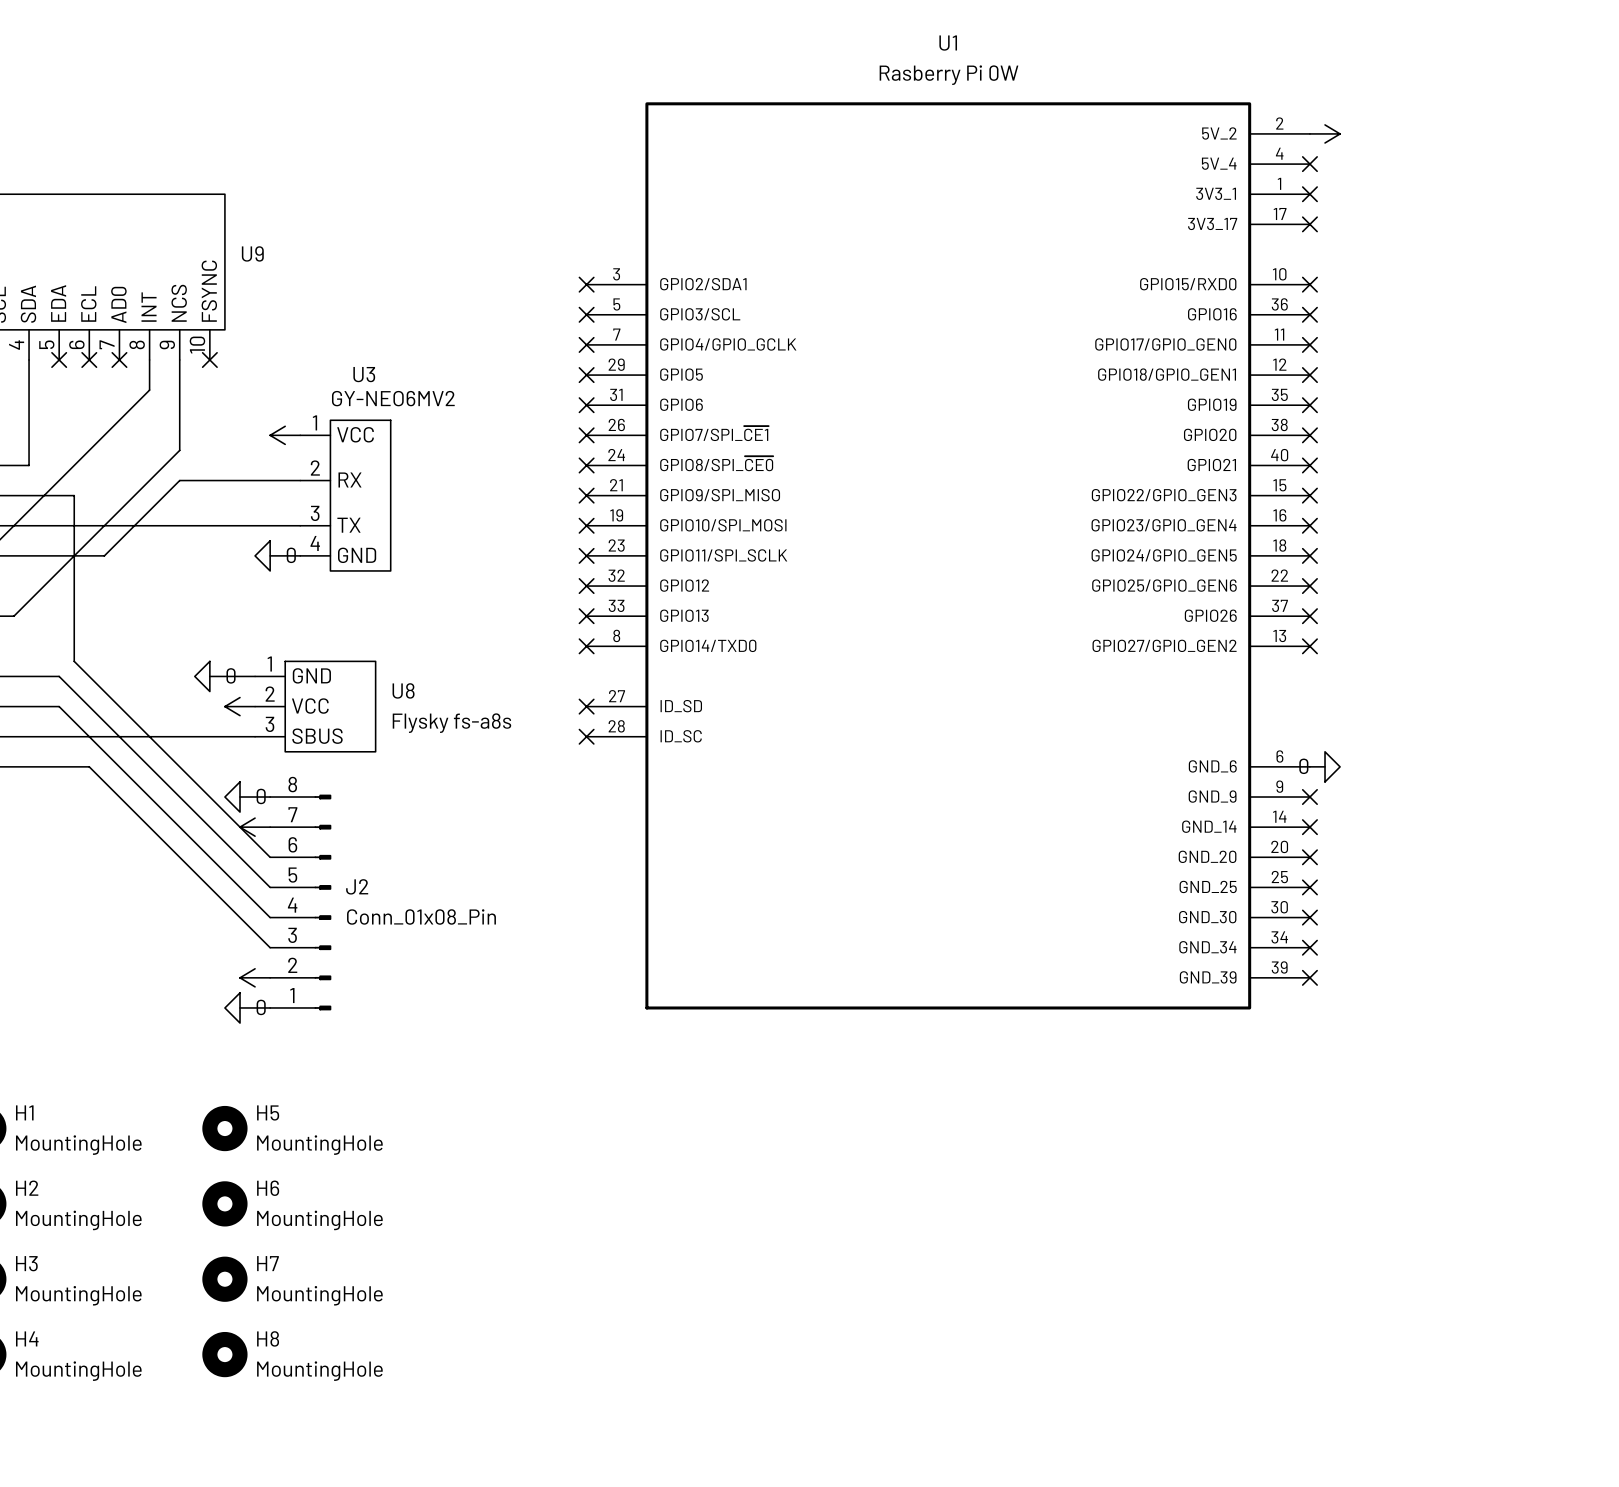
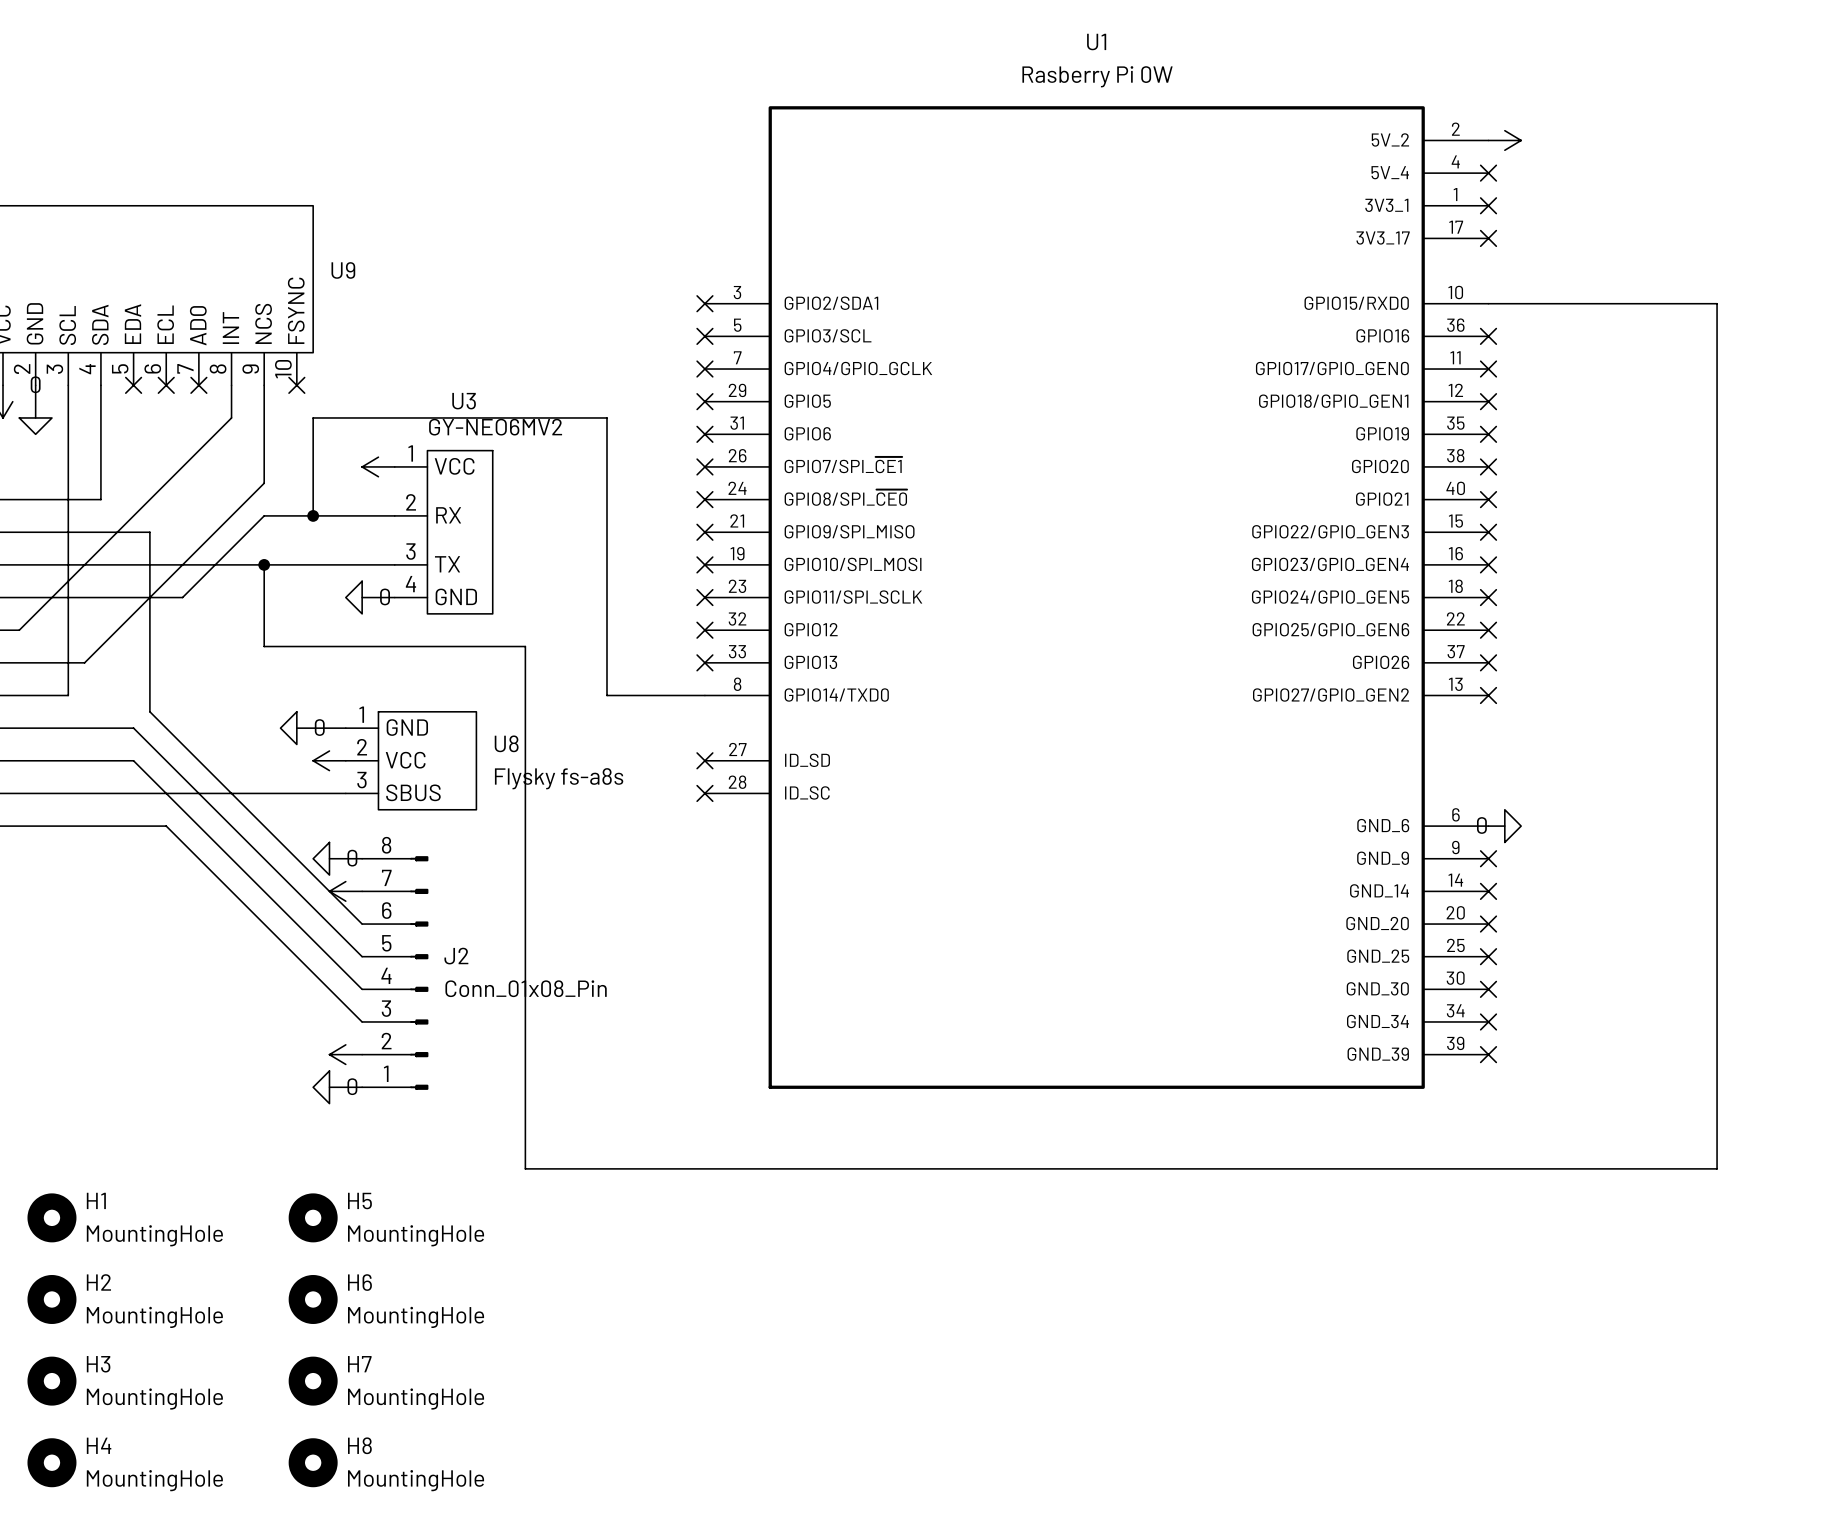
wire: none -> (1488, 303) (1717, 303) (1717, 1168) (525, 1168) (525, 646) (264, 646) (264, 564)
no-connect mark: (1309, 284) -> none
wire: none -> (313, 515) (313, 417) (606, 417) (606, 695) (704, 695)
junction: none -> (313, 515)
junction: none -> (264, 564)
no-connect mark: (586, 646) -> none

